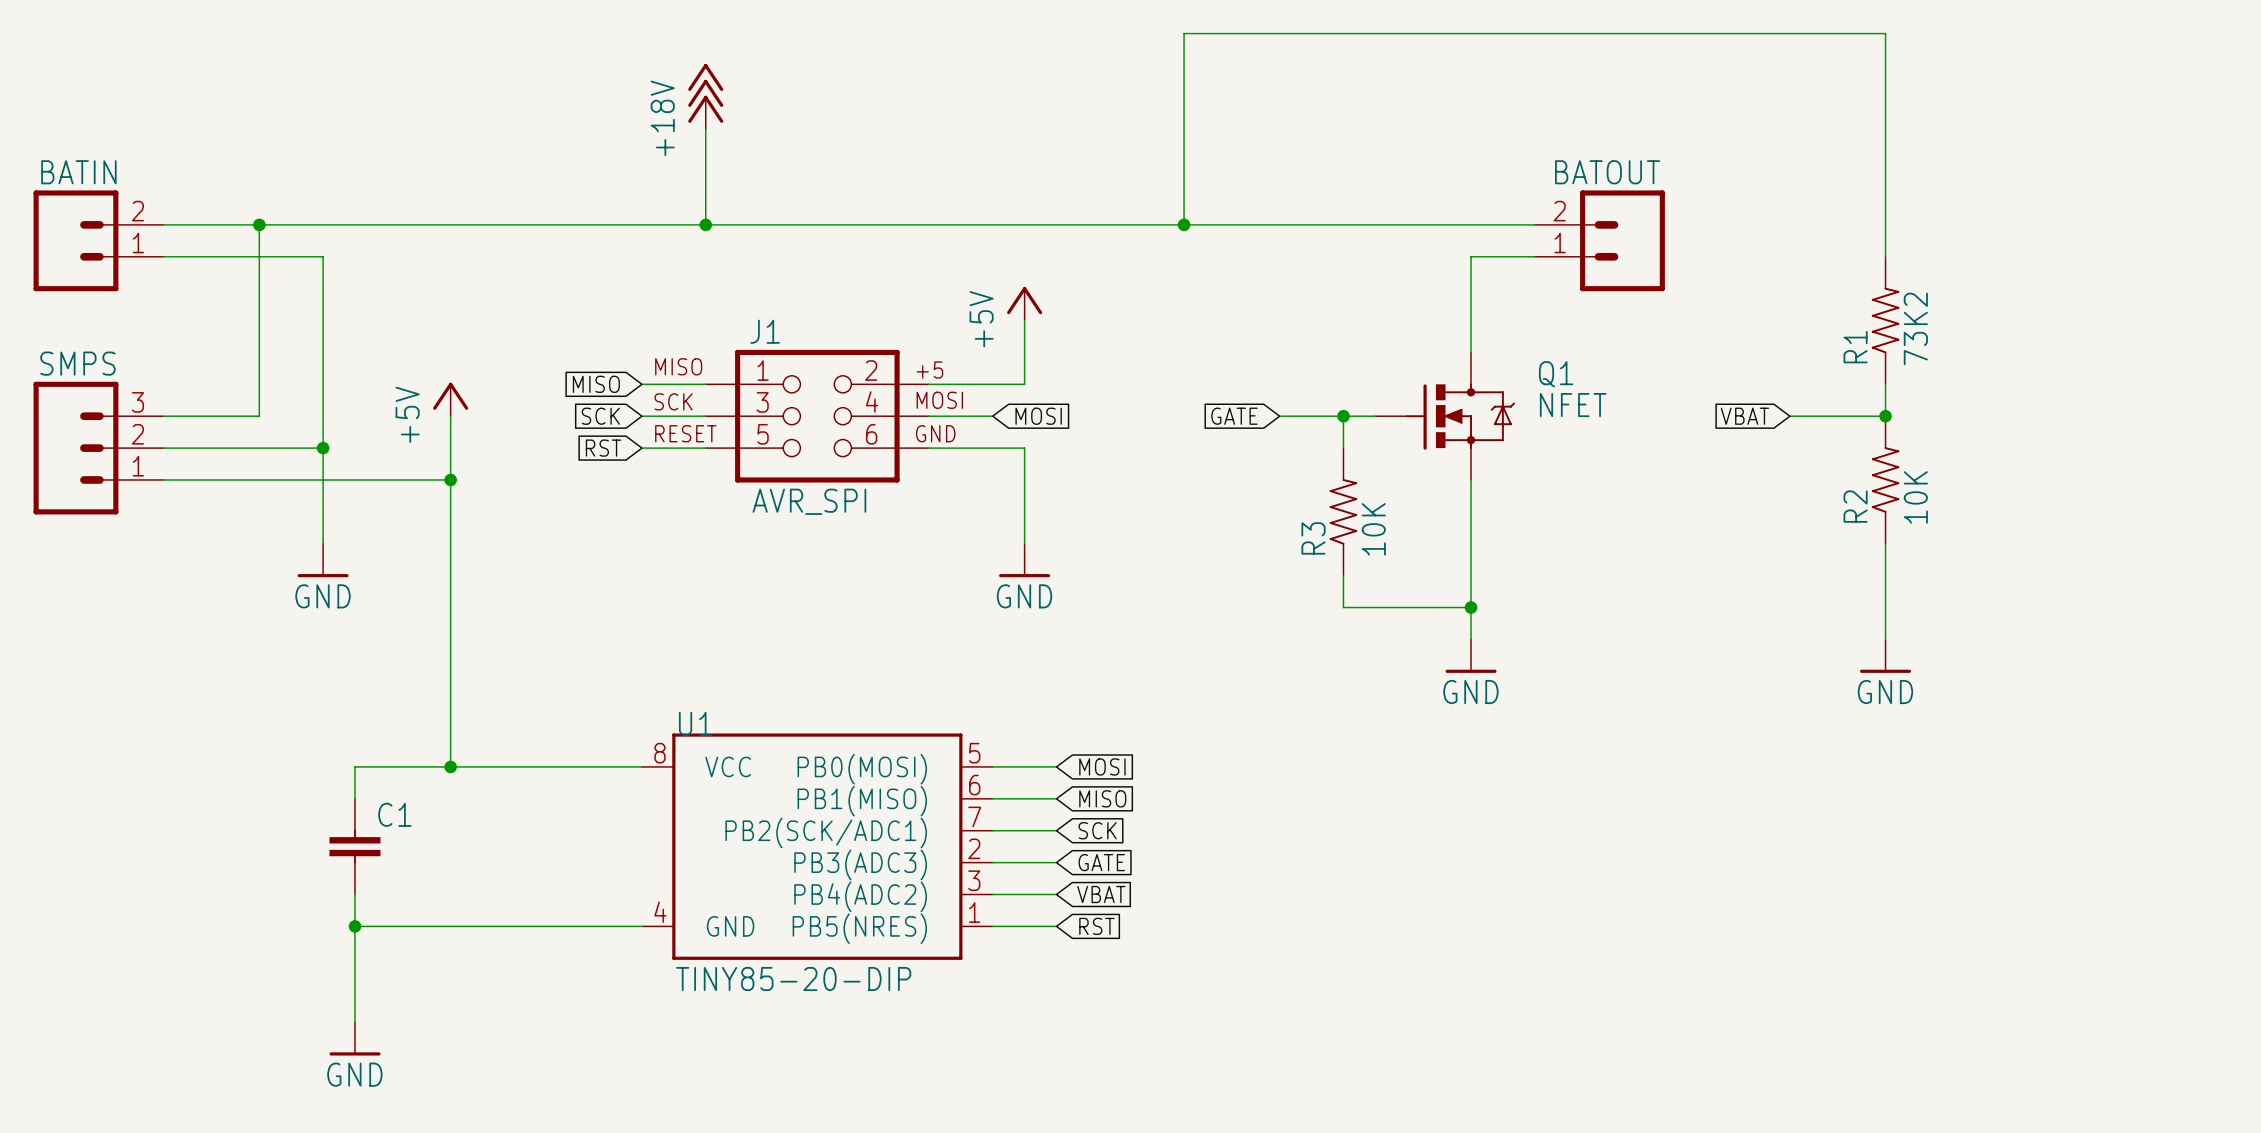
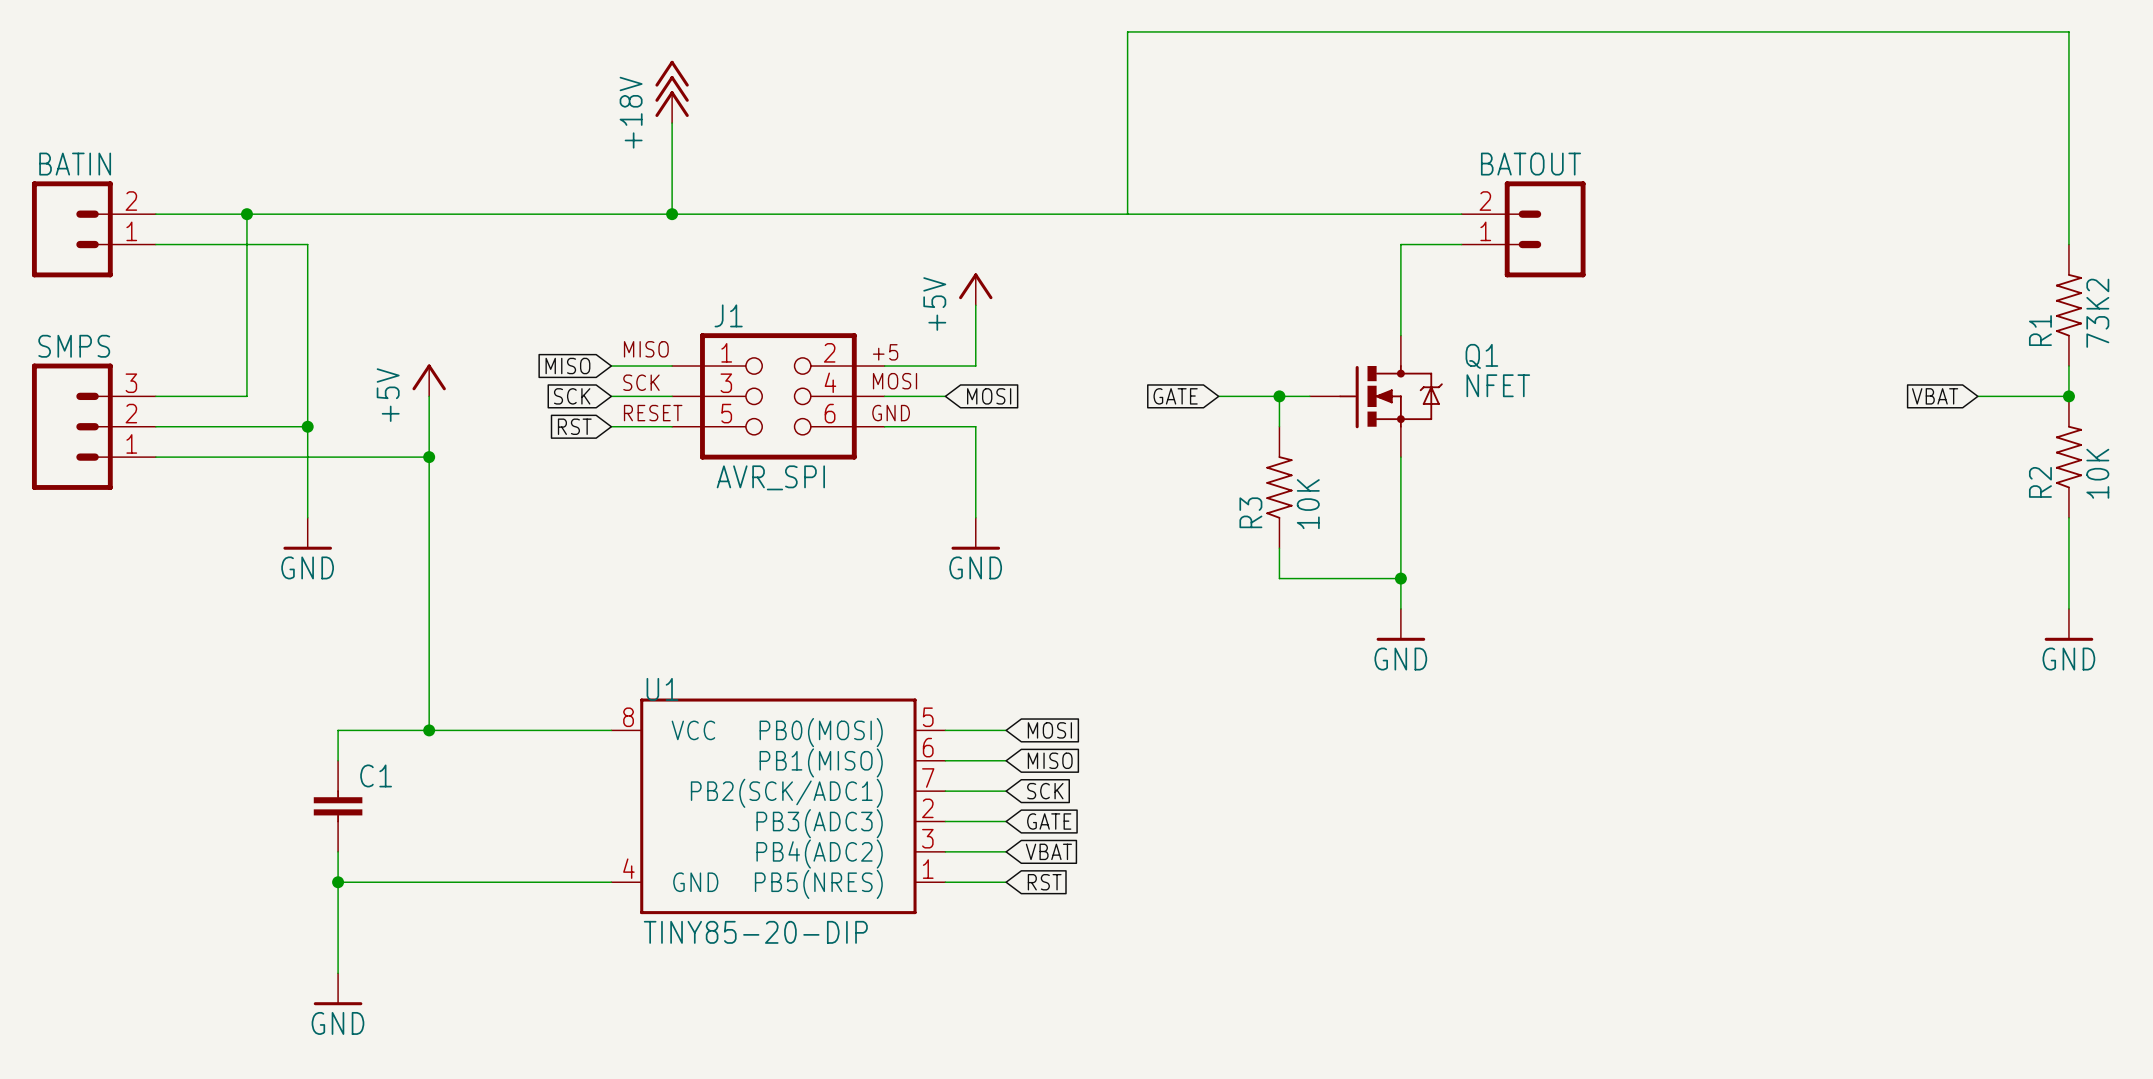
wire: (1885, 33) (1885, 256) -> (1795, 31) (2068, 31) (2068, 244)
junction: (1184, 224) -> none
R1 position: (1885, 320) -> (2068, 305)
wire: (1885, 384) (1885, 416) (1789, 416) -> (2068, 366) (2068, 396) (1977, 396)
global label position: VBAT (1744, 416) -> VBAT (1935, 396)
junction: (1885, 416) -> none
junction: none -> (2068, 396)
R2 position: (1885, 479) -> (2068, 457)
wire: (1885, 543) (1885, 639) -> (2068, 517) (2068, 608)
power symbol position: GND (1885, 656) -> GND (2068, 624)

